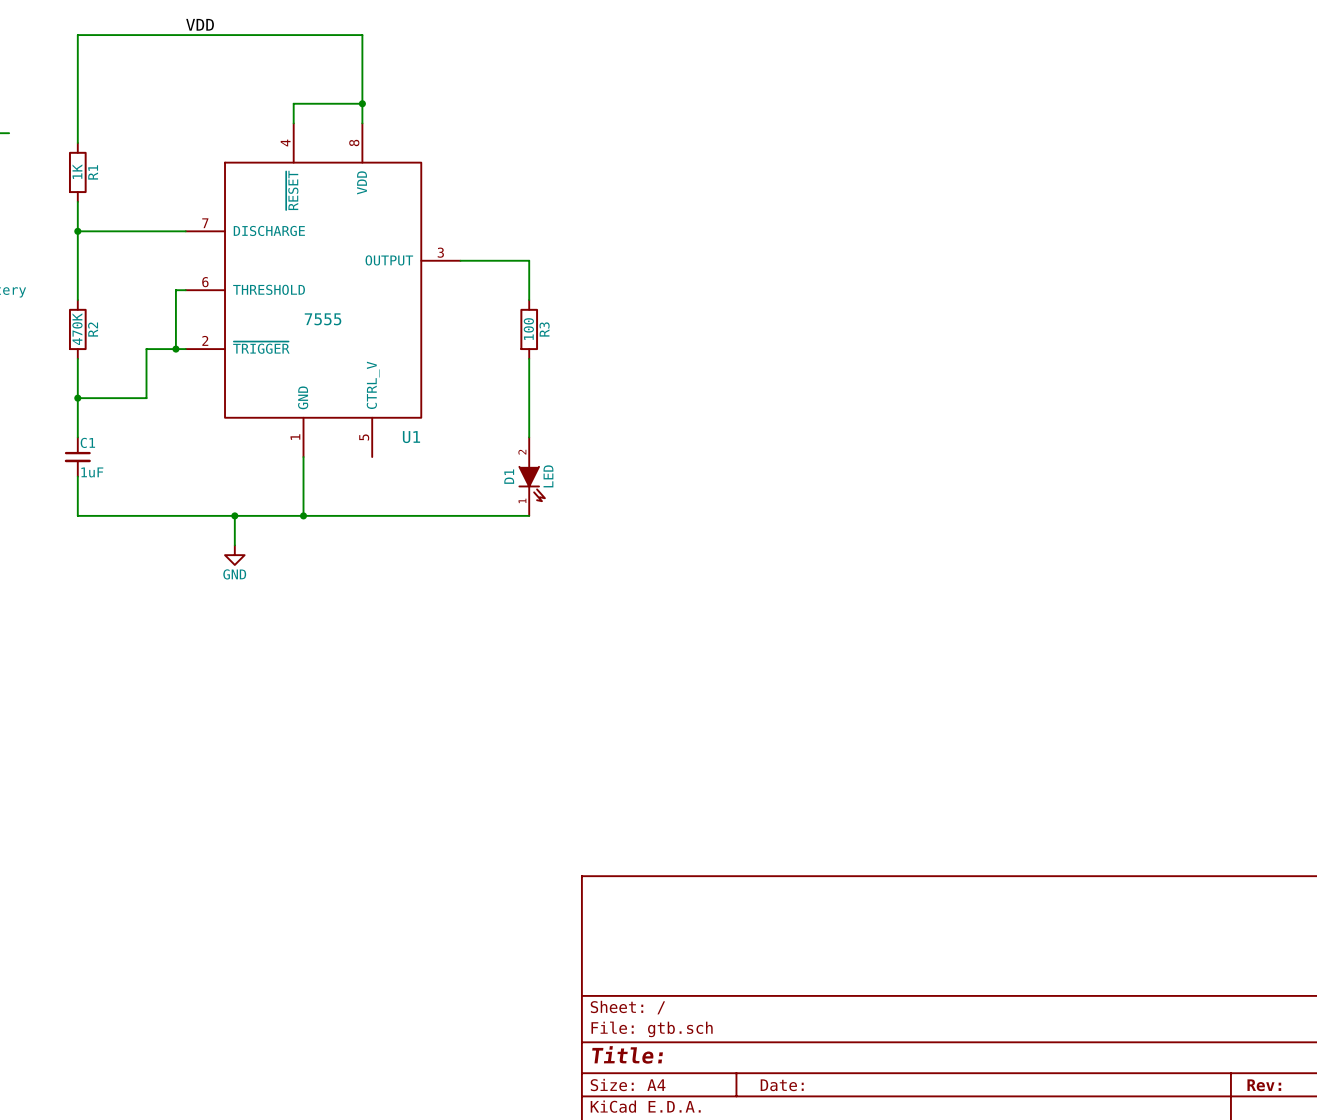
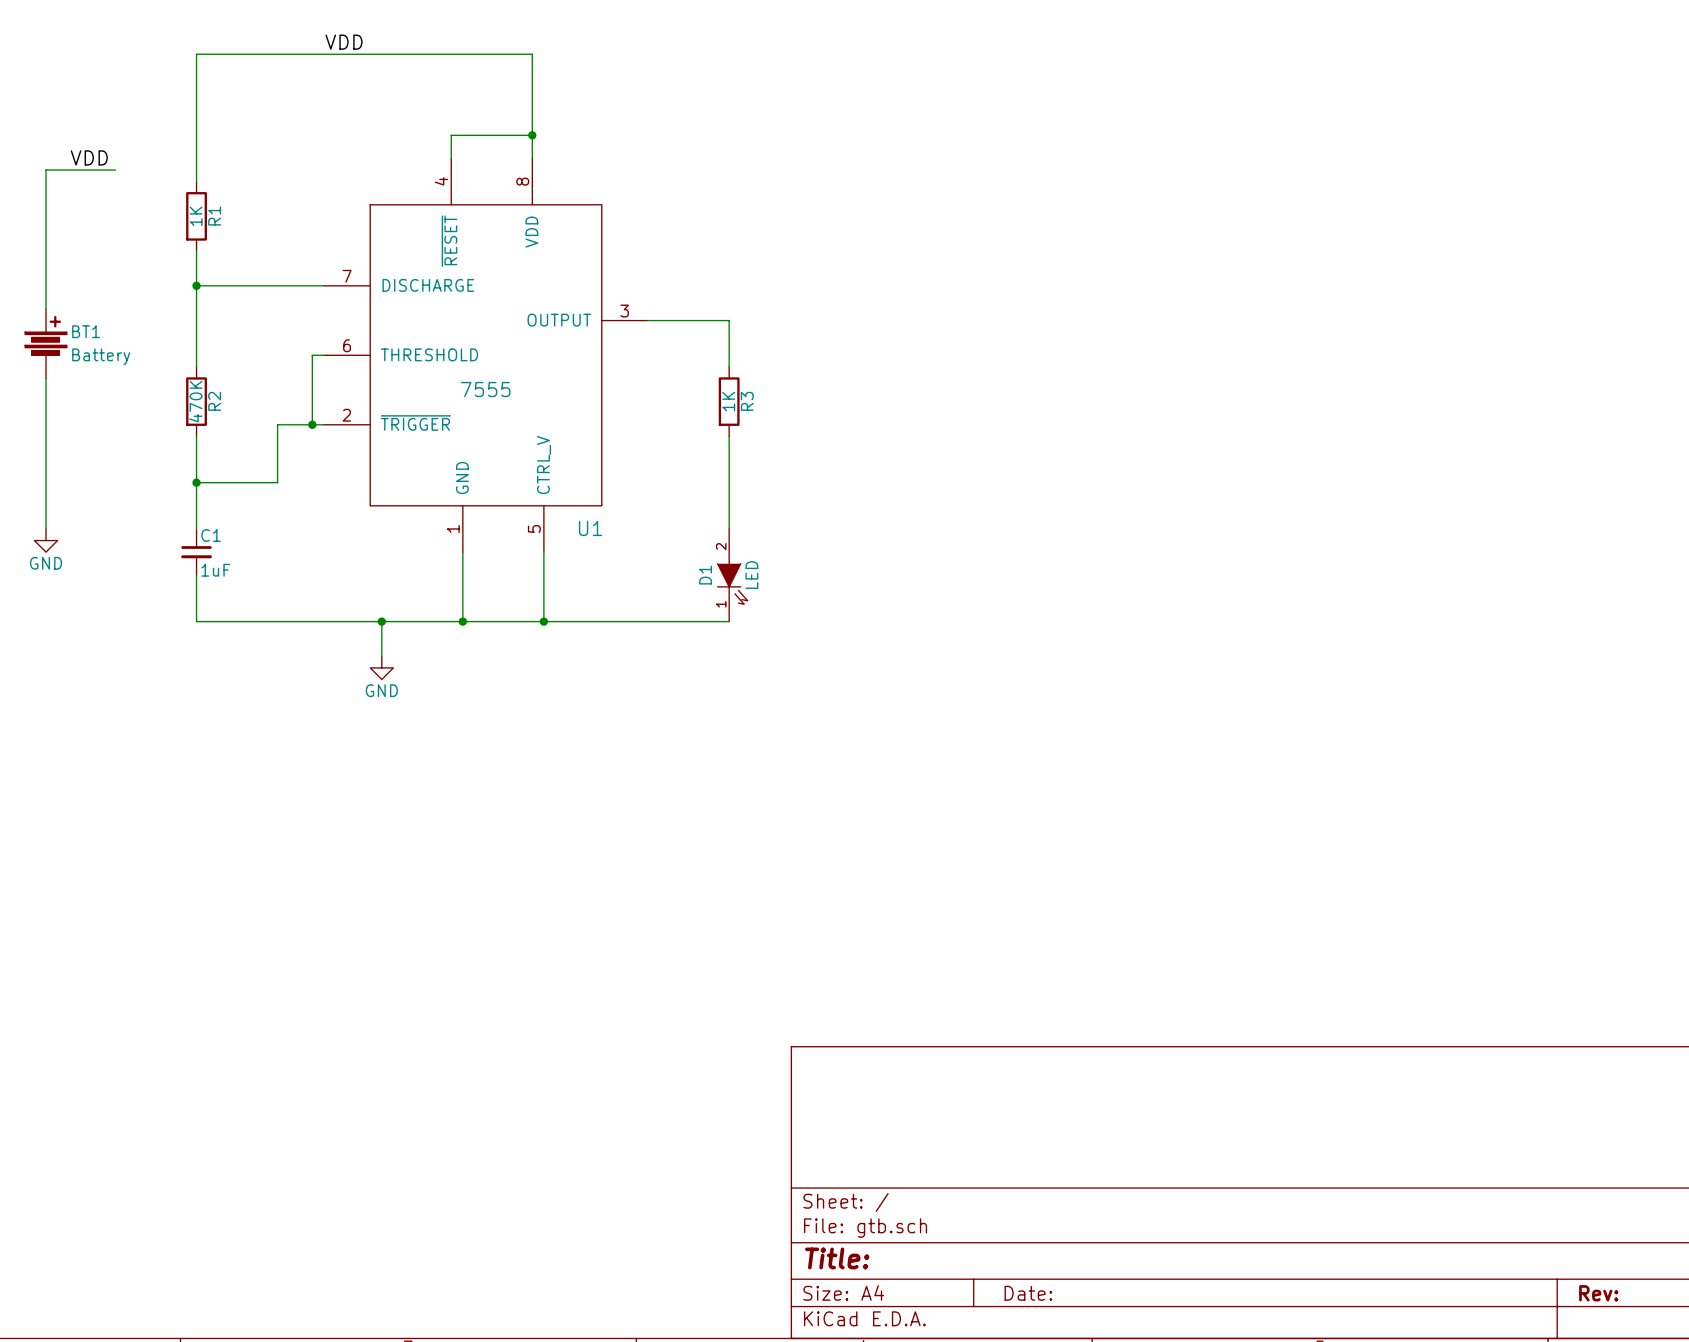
R3 value: 100 (528, 329) -> 1K (728, 401)
wire: none -> (543, 552) (543, 621)
junction: none -> (543, 621)

